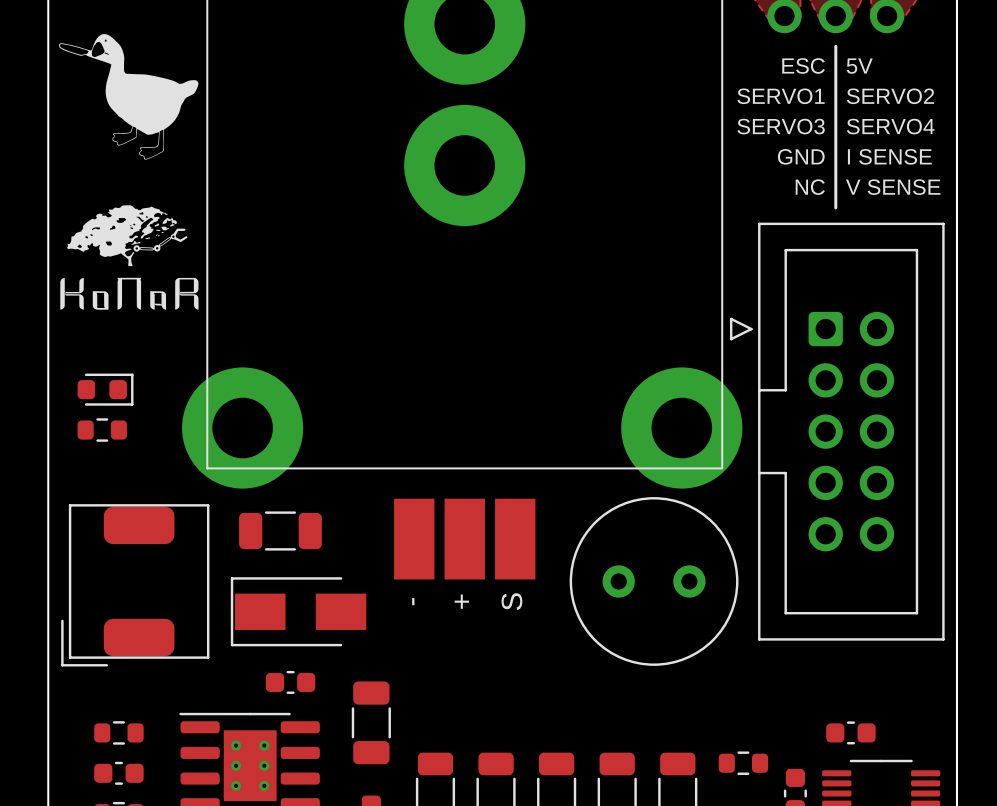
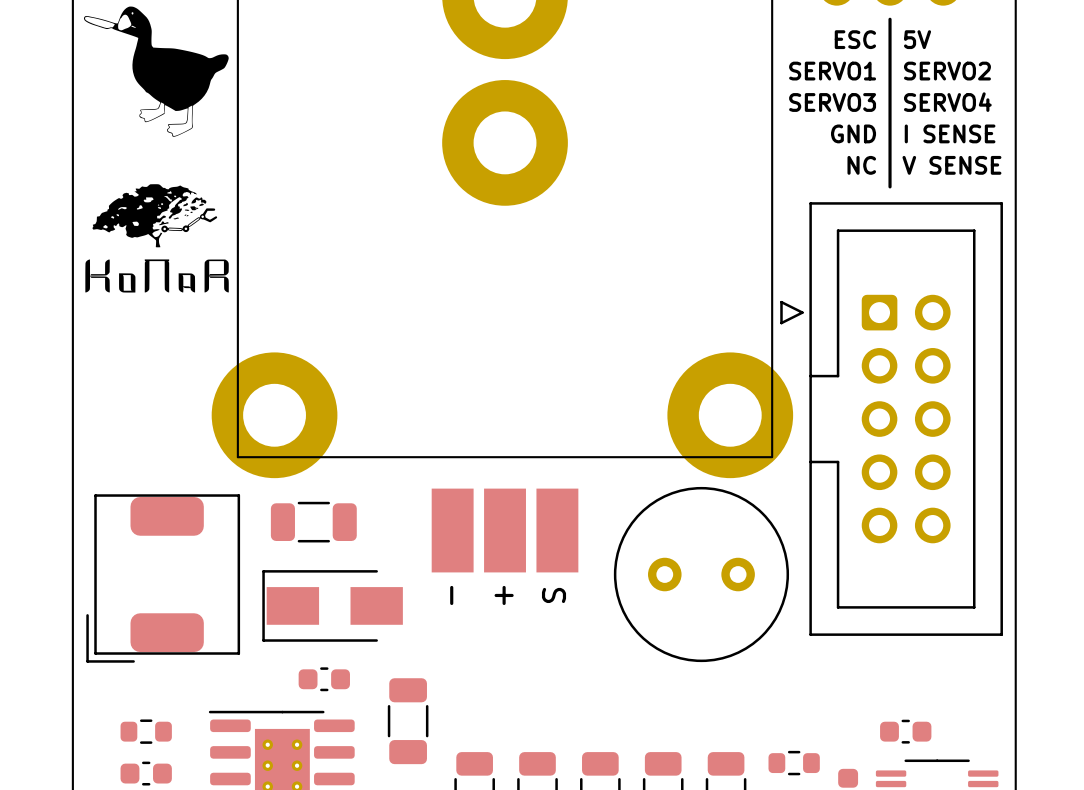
part: (105, 389) -> none
part: (102, 430) -> none

